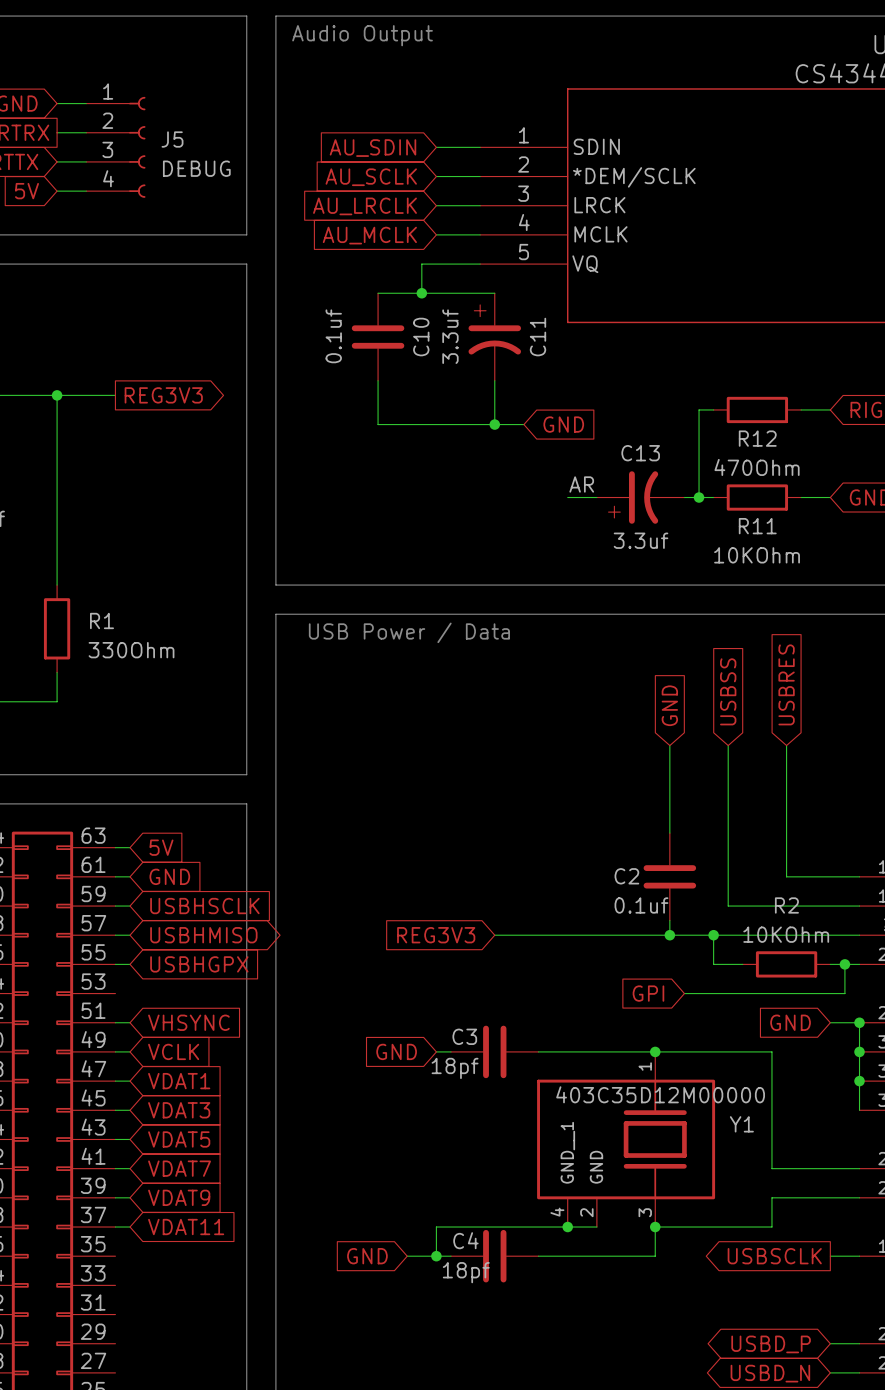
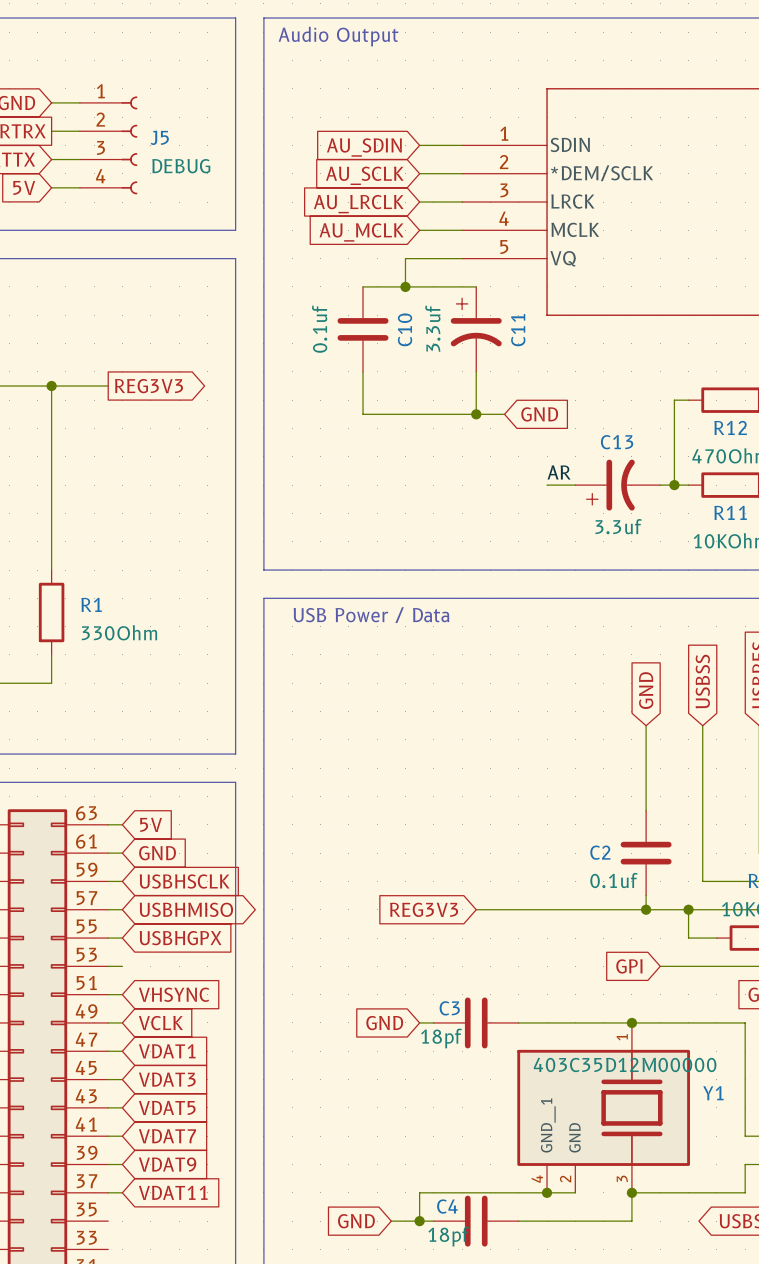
wire: none -> (108, 966) (122, 966)

